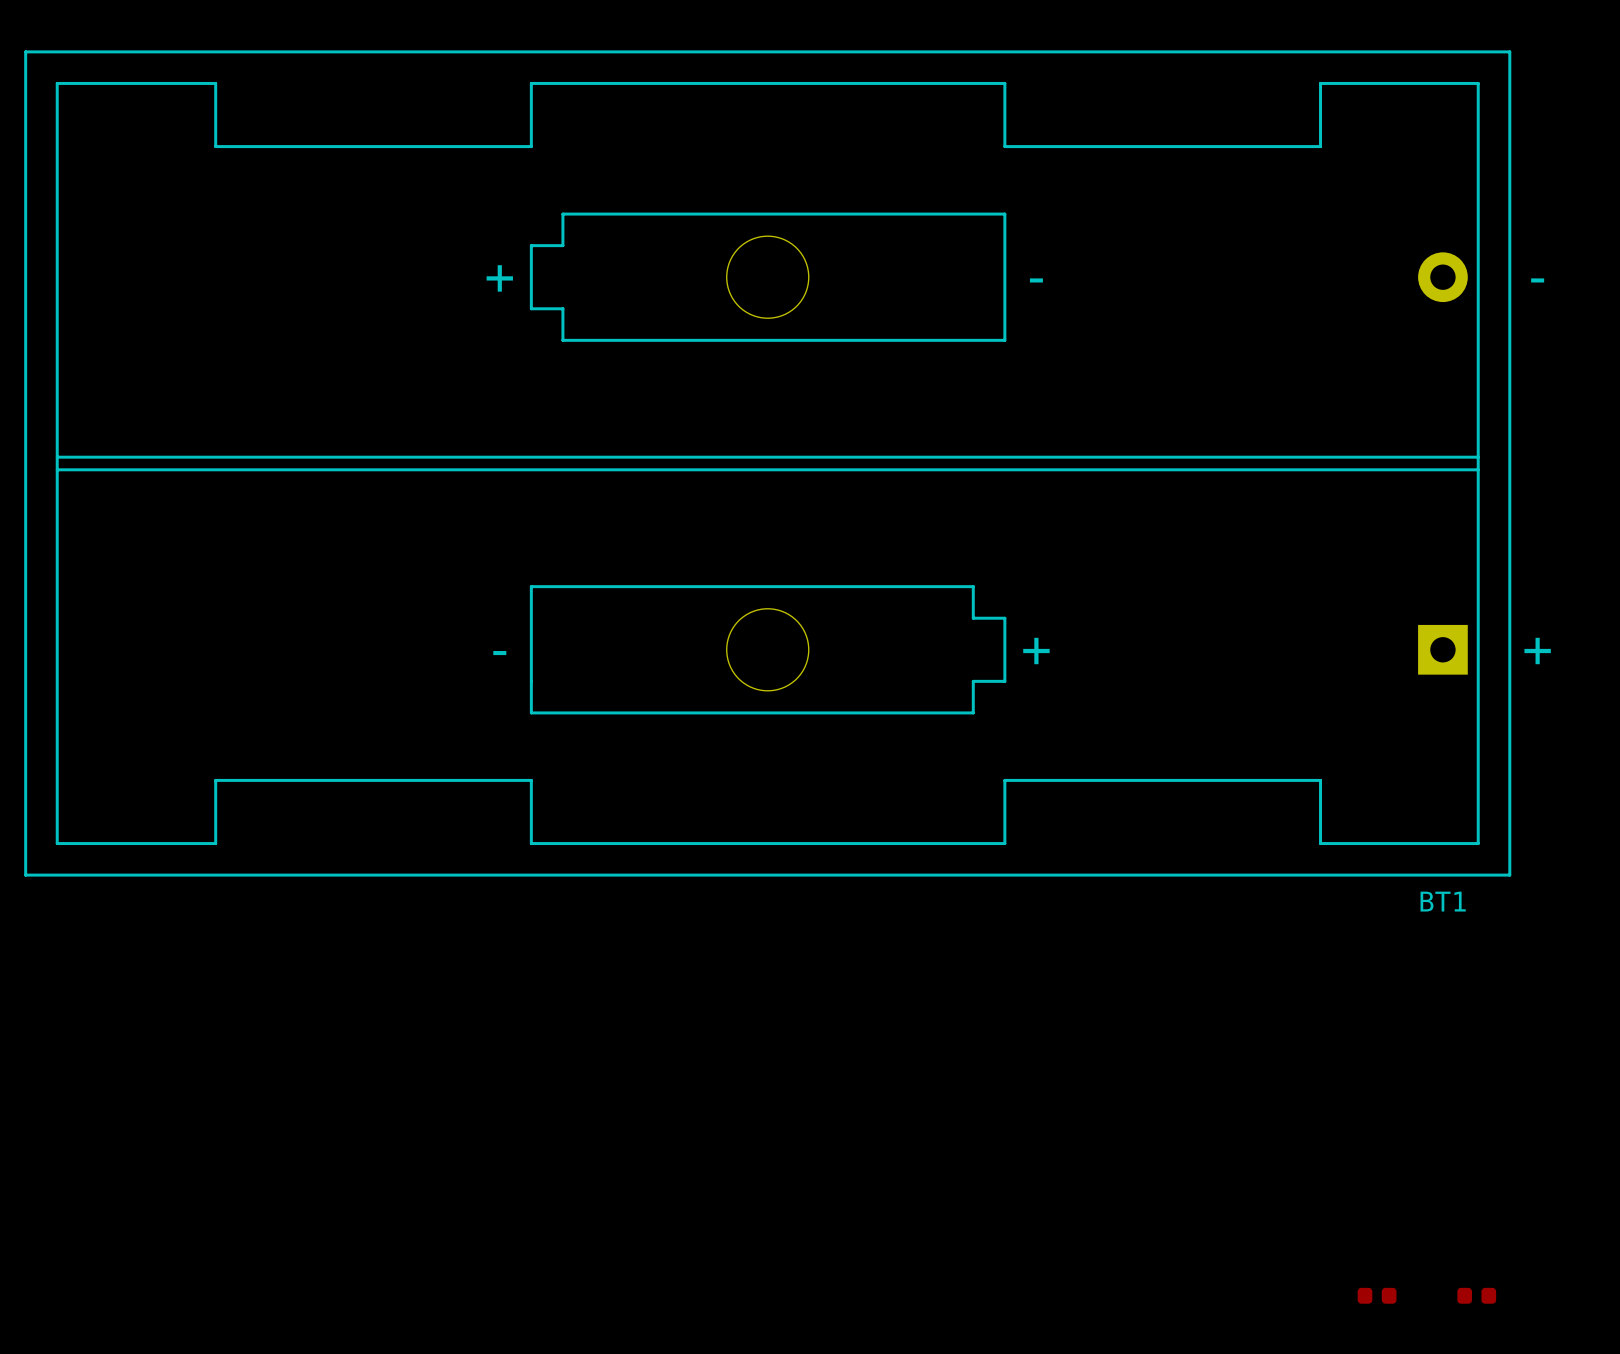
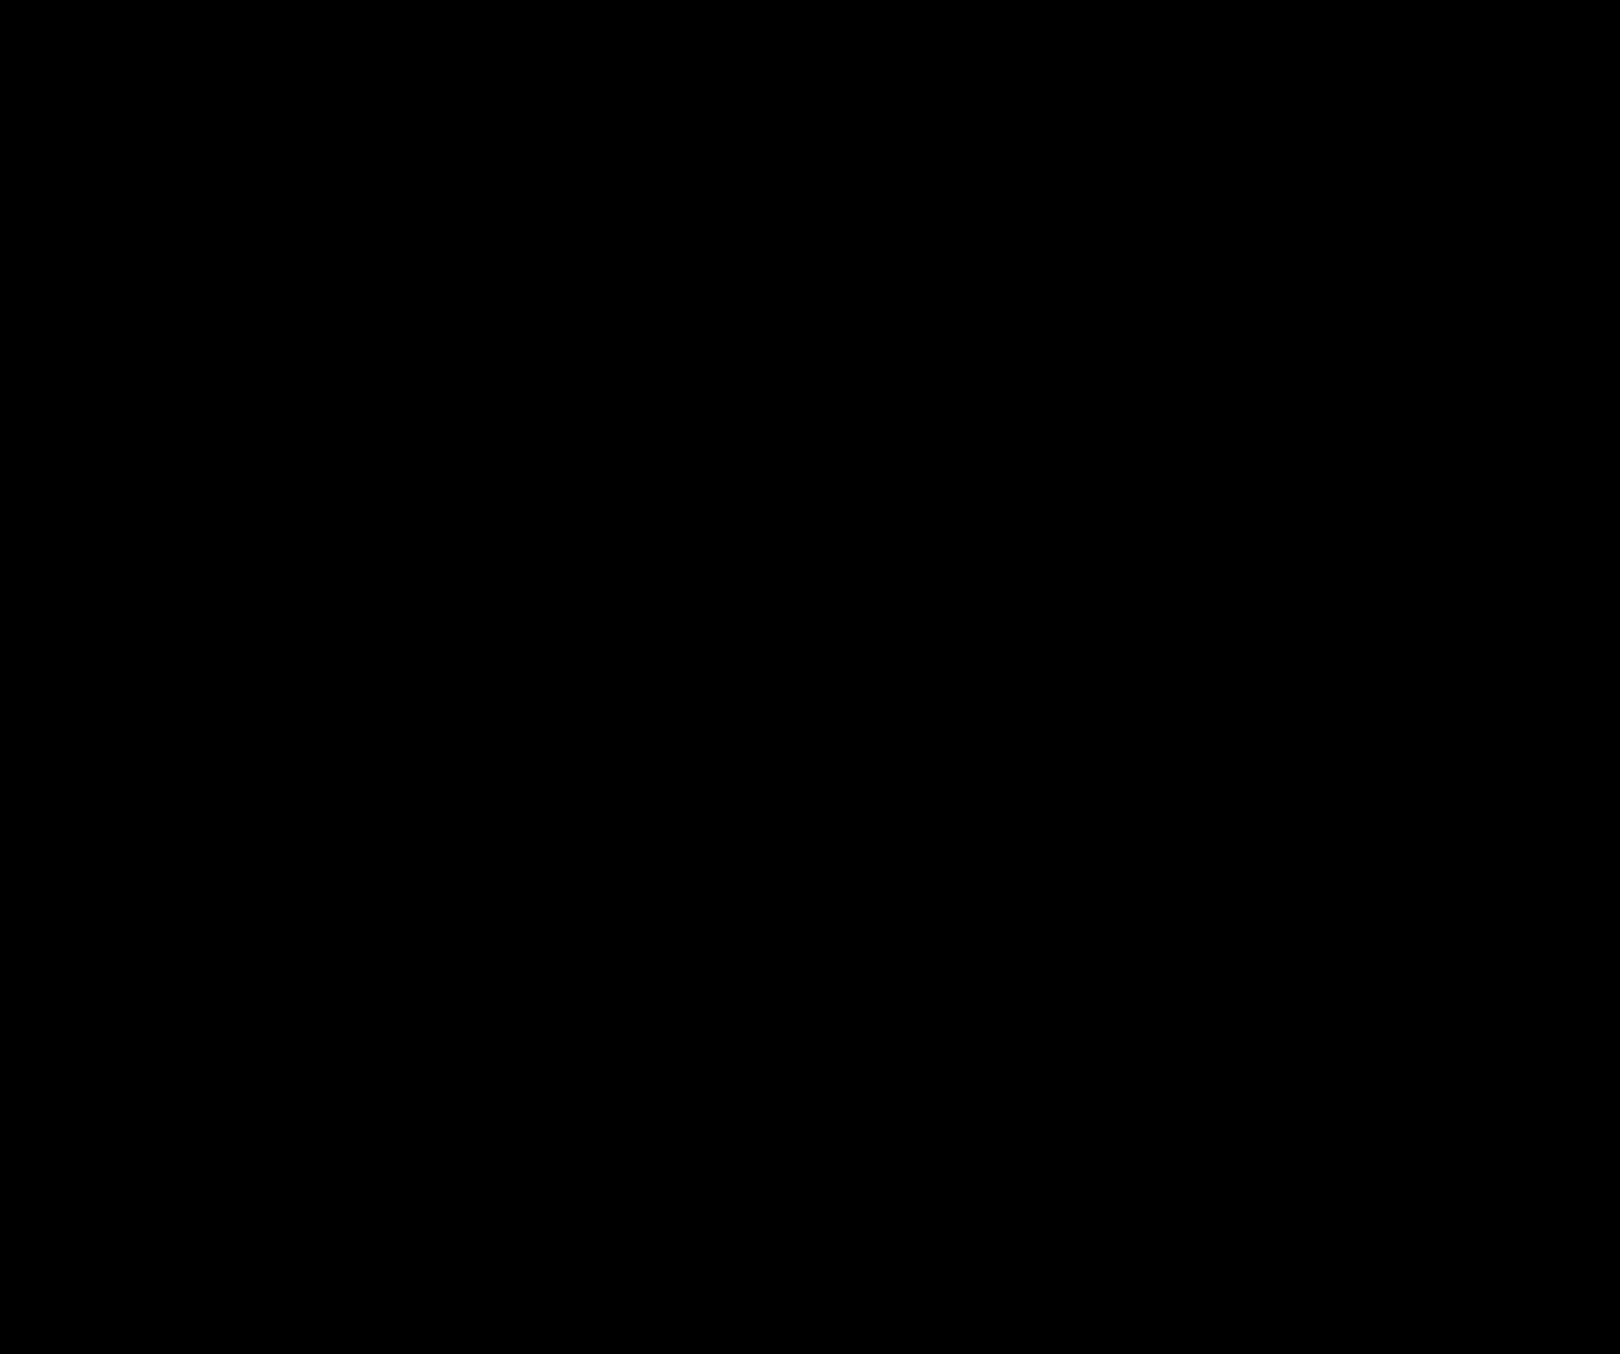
BT1: (767, 463) -> none
part: (1377, 1295) -> none
part: (1476, 1295) -> none

